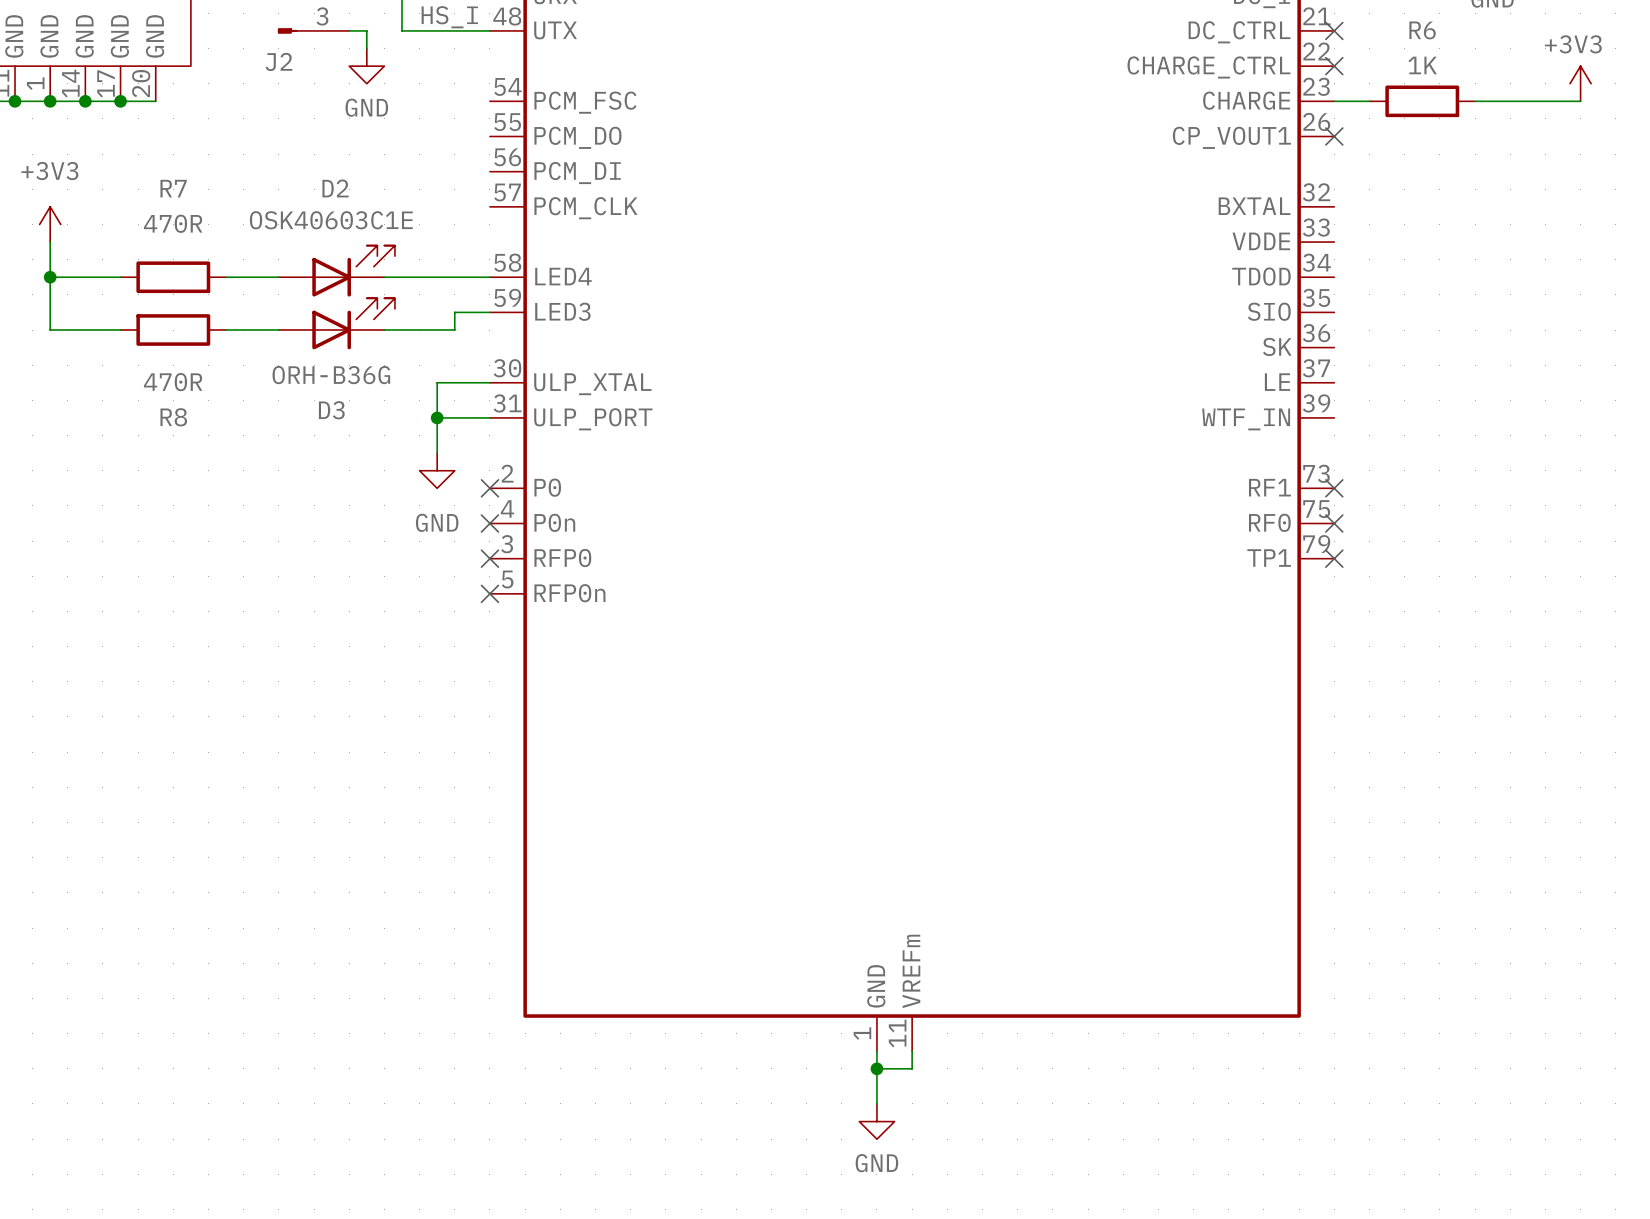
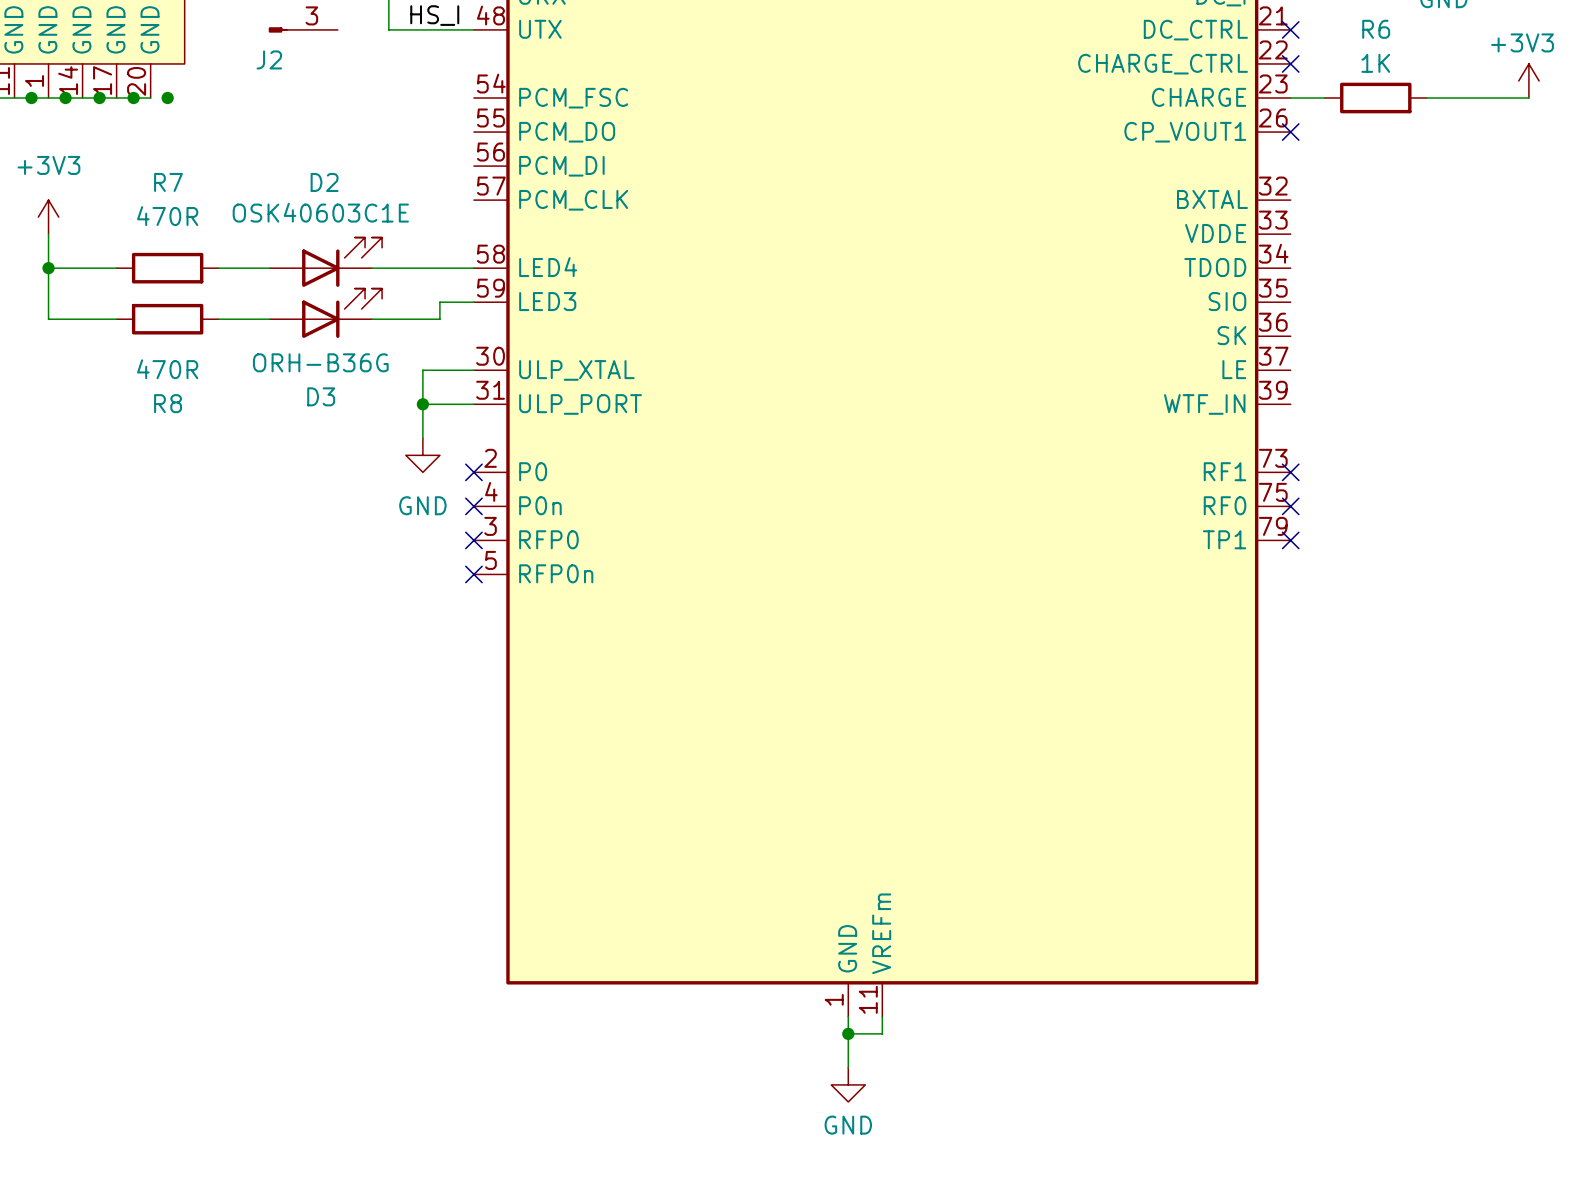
wire: (349, 30) (366, 30) (366, 48) -> none
power symbol: GND (366, 66) -> none
junction: (15, 101) -> none
junction: none -> (31, 98)
junction: (50, 101) -> none
junction: none -> (65, 98)
junction: (85, 101) -> none
junction: none -> (99, 98)
junction: (120, 101) -> none
junction: none -> (133, 98)
junction: none -> (167, 98)

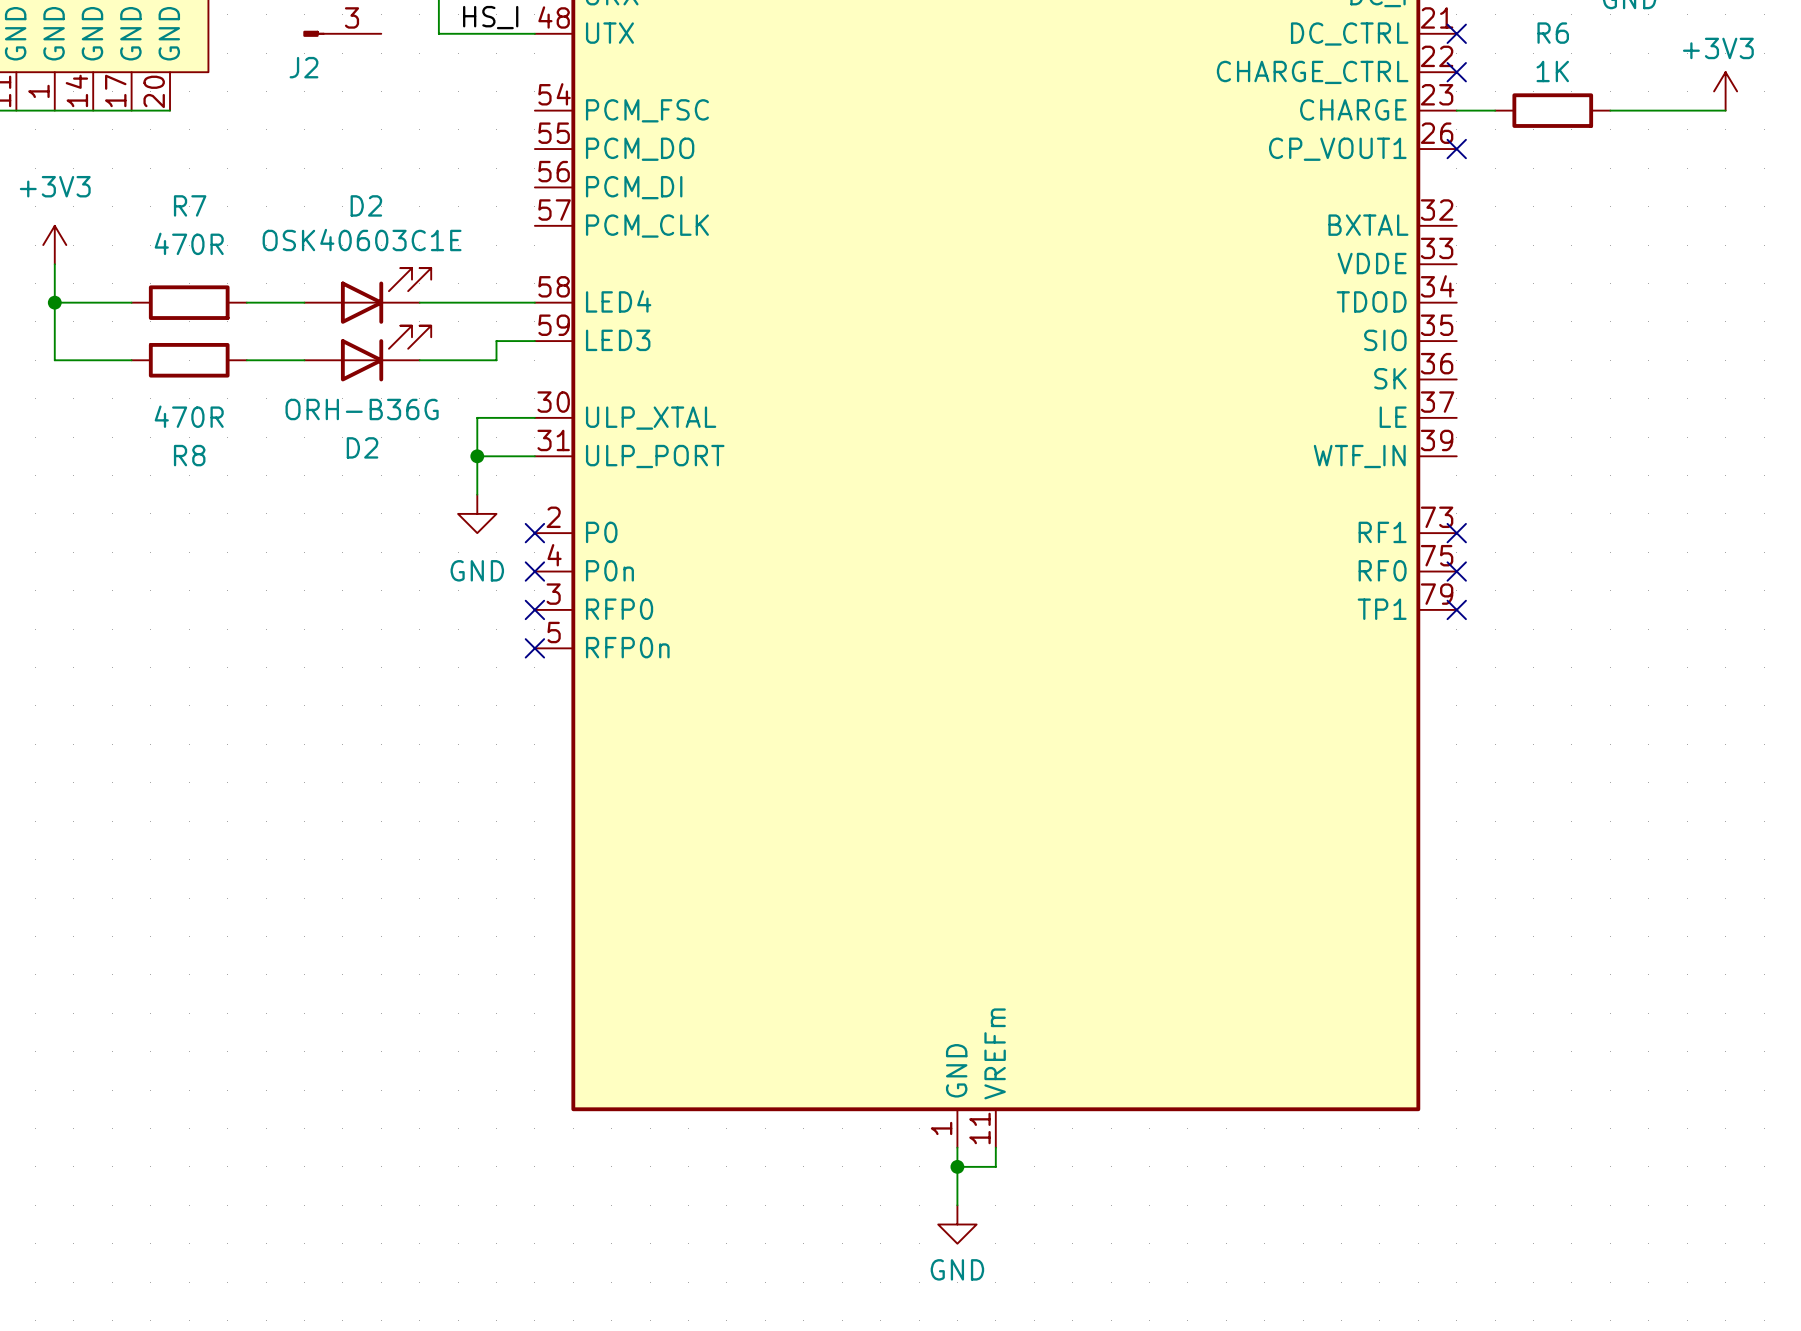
junction: (31, 98) -> none
junction: (65, 98) -> none
junction: (99, 98) -> none
junction: (133, 98) -> none
junction: (167, 98) -> none
D3 name: D3 (321, 396) -> D2 (362, 447)

